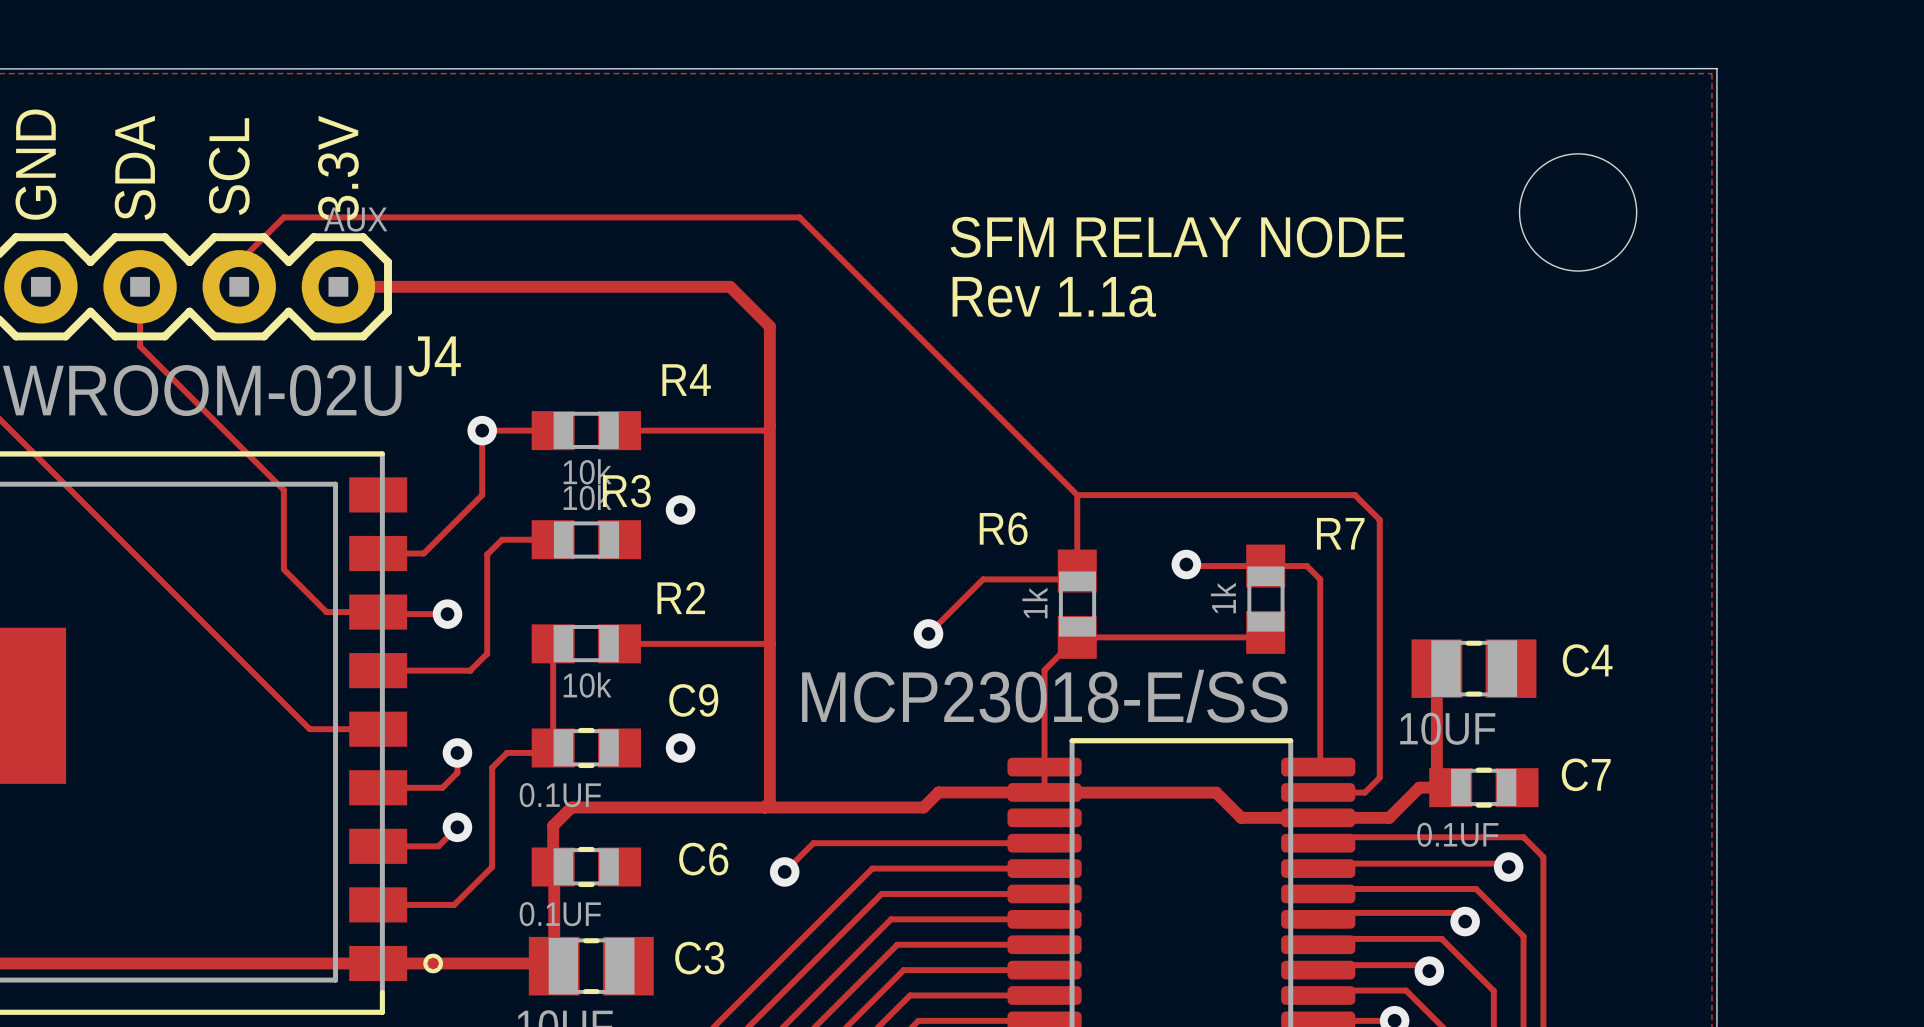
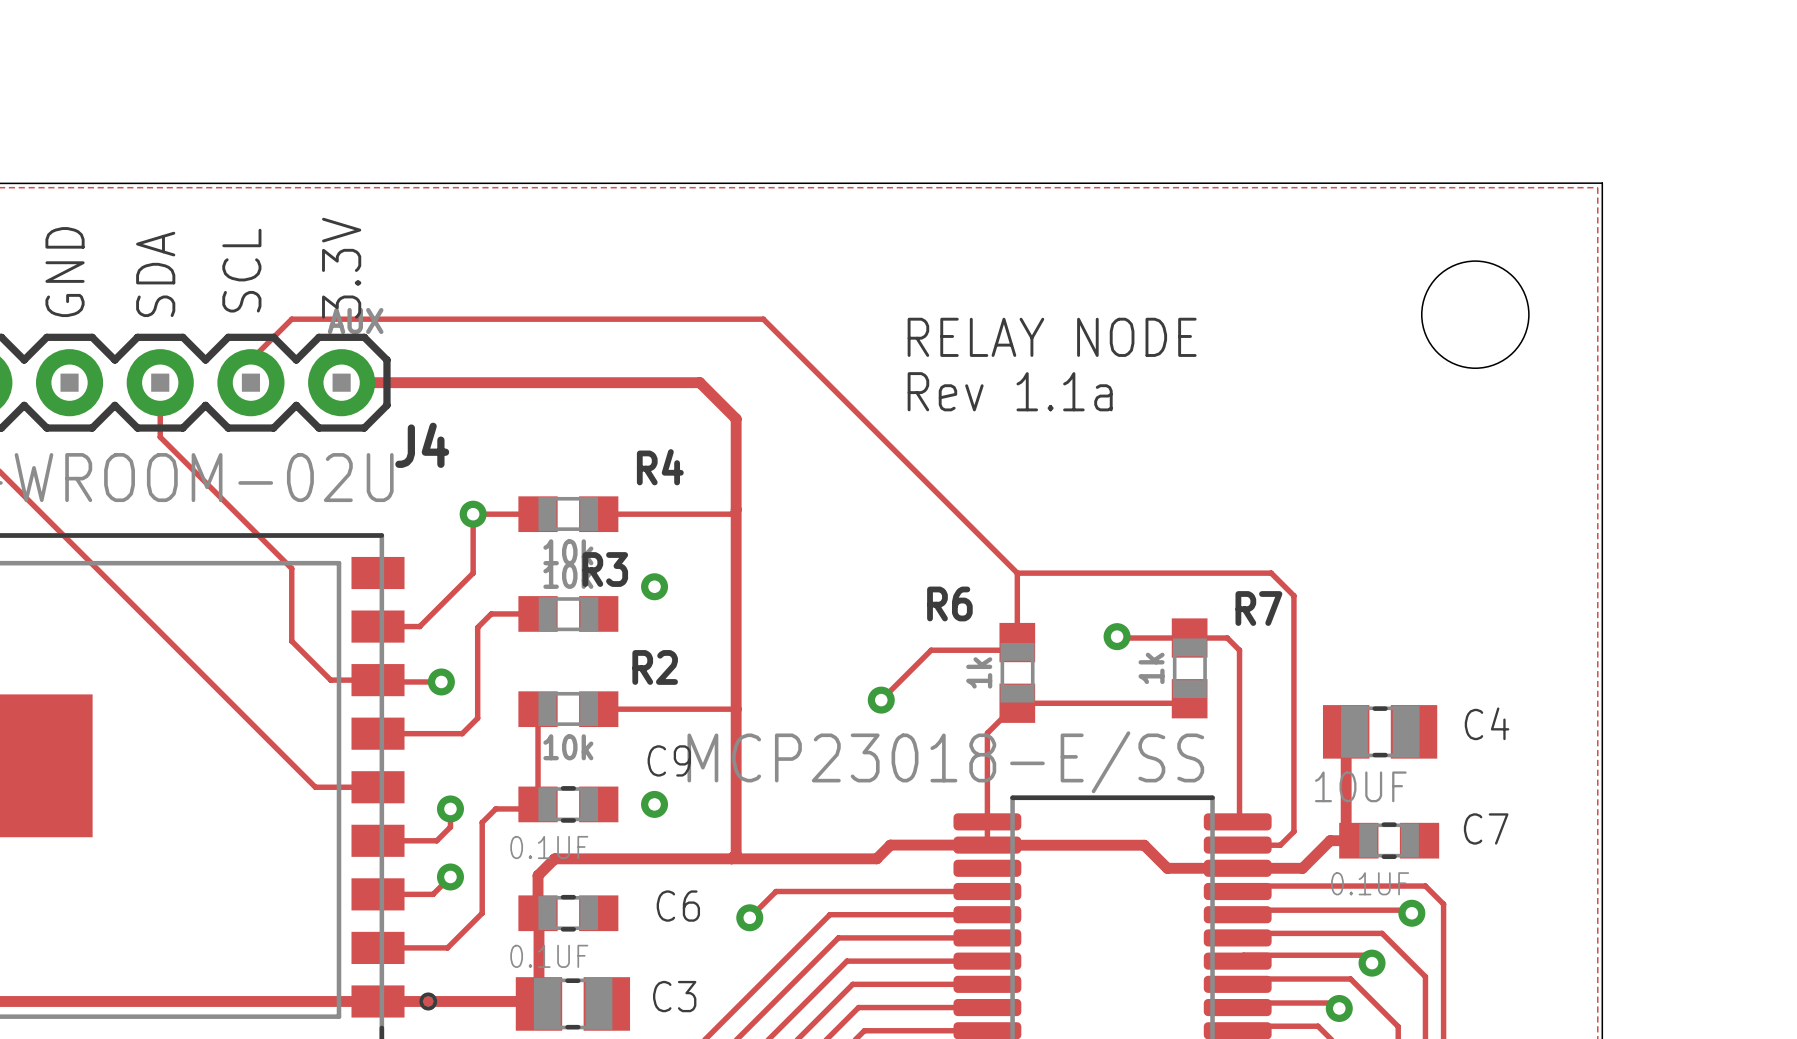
text: SFM RELAY NODE (1177, 237) -> RELAY NODE (1052, 337)

